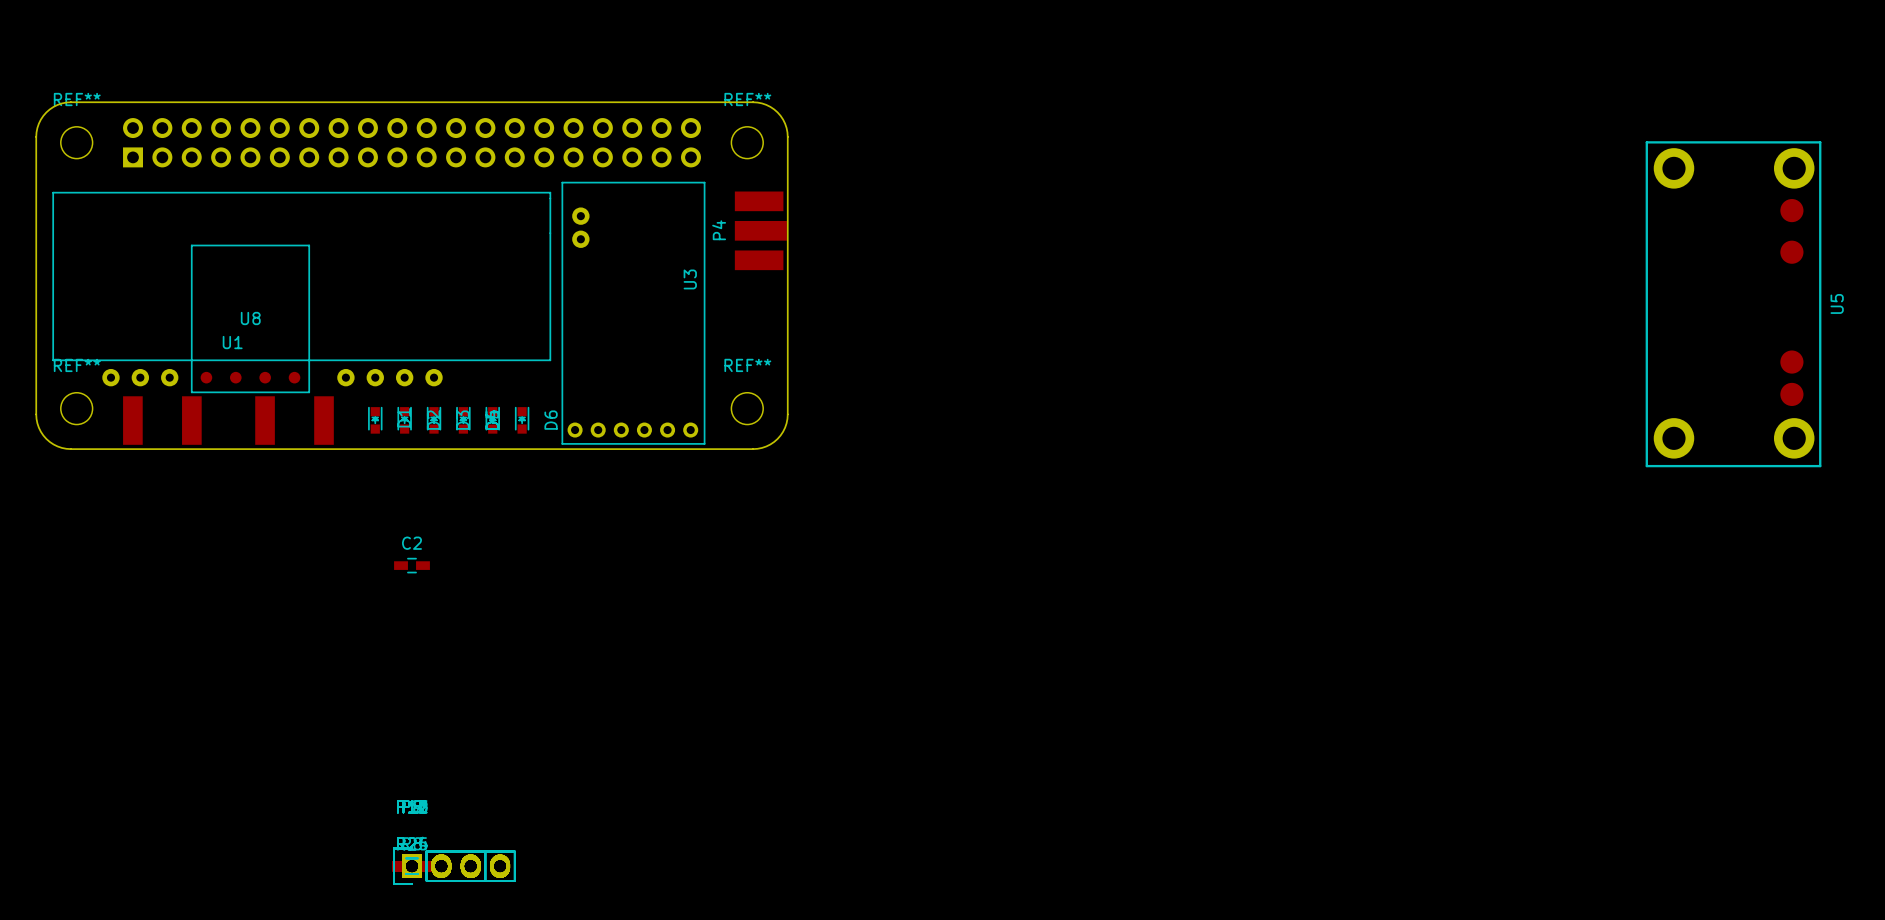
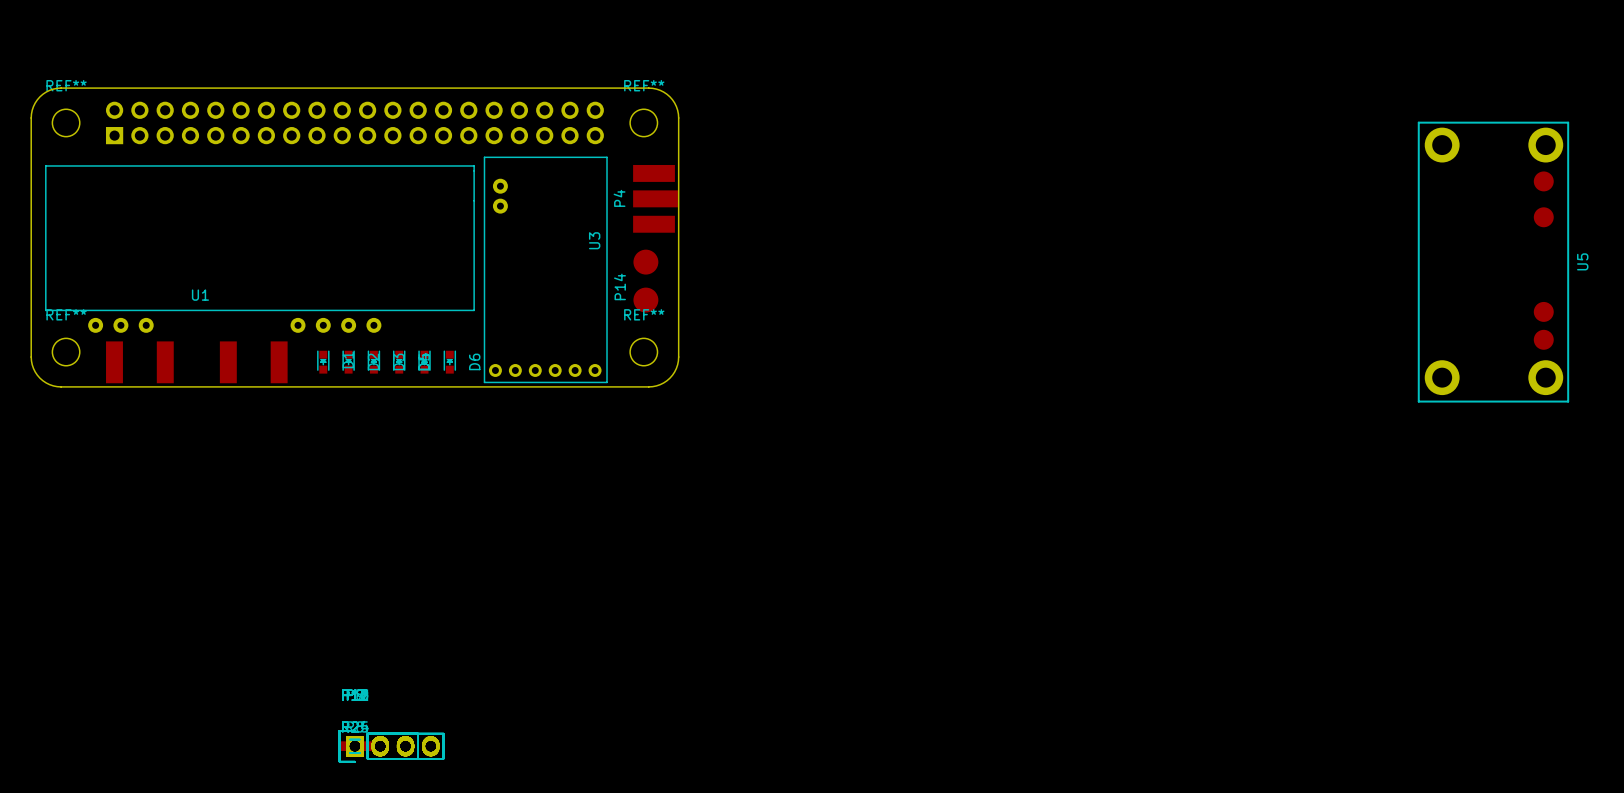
U8: (250, 318) -> none
P14: none -> (645, 281)
C2: (411, 565) -> none

